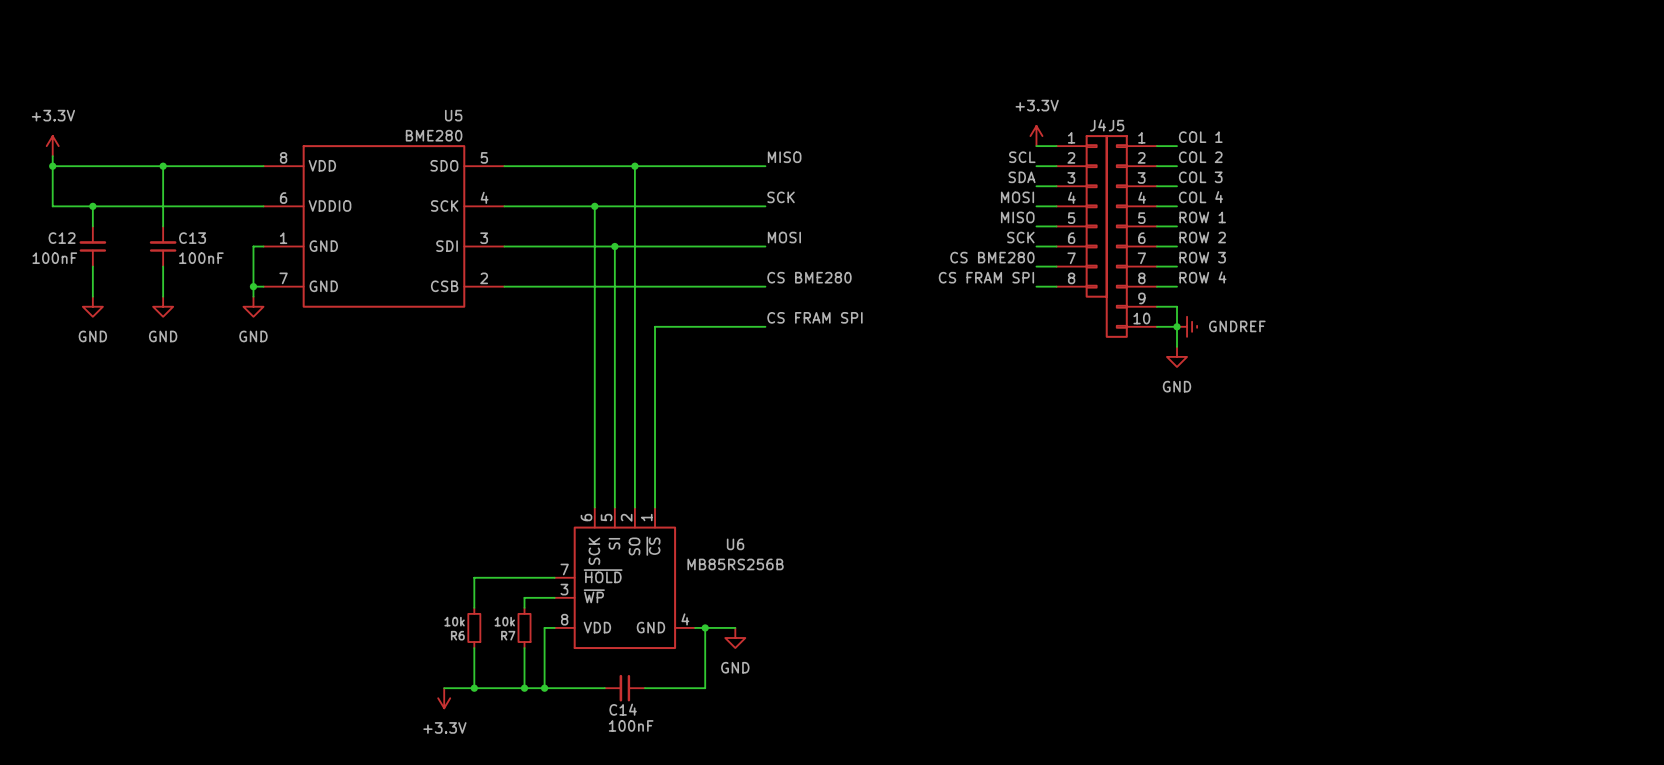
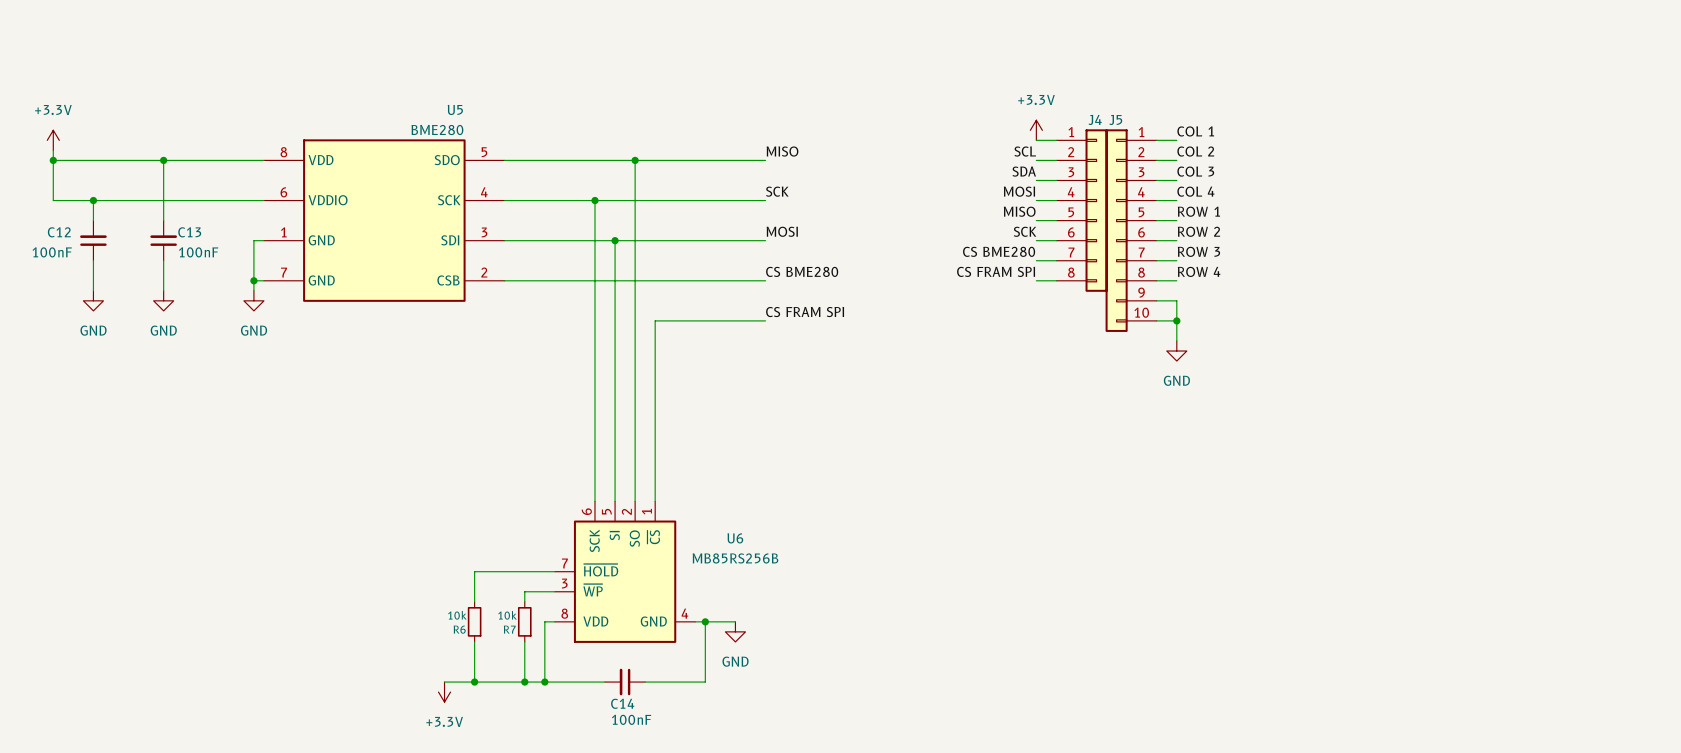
power symbol: GNDREF (1187, 326) -> none

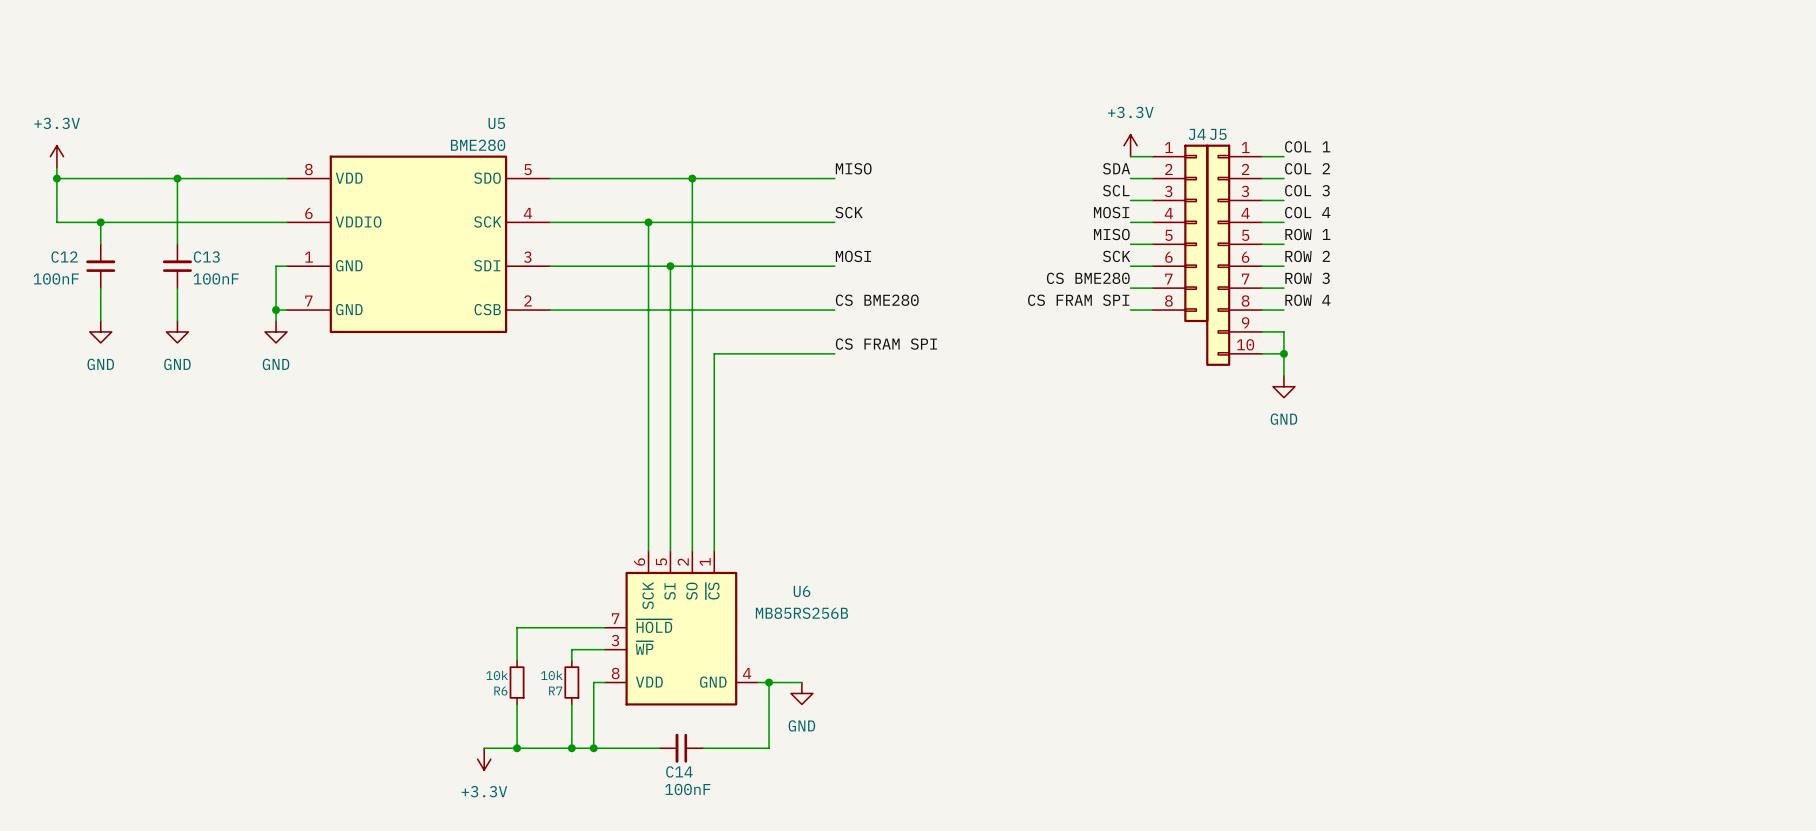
label: SCL (1025, 151) -> SDA (1116, 168)
label: SDA (1024, 171) -> SCL (1116, 190)

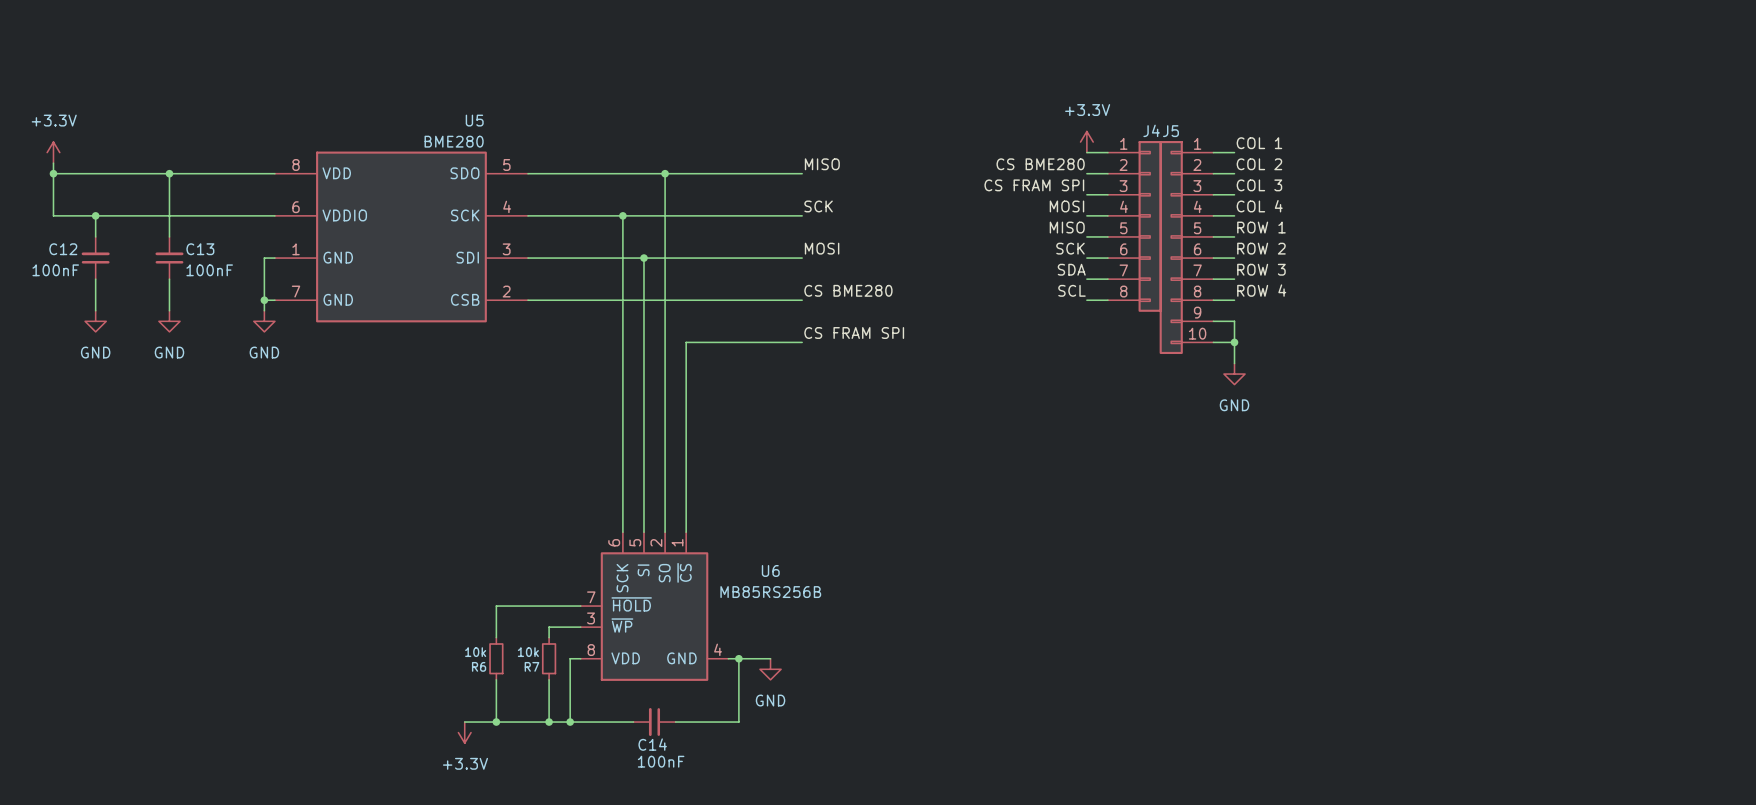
label: SDA (1116, 168) -> CS BME280 (1040, 164)
label: SCL (1116, 190) -> CS FRAM SPI (1034, 185)
label: CS BME280 (1088, 278) -> SDA (1071, 269)
label: CS FRAM SPI (1078, 300) -> SCL (1071, 290)

